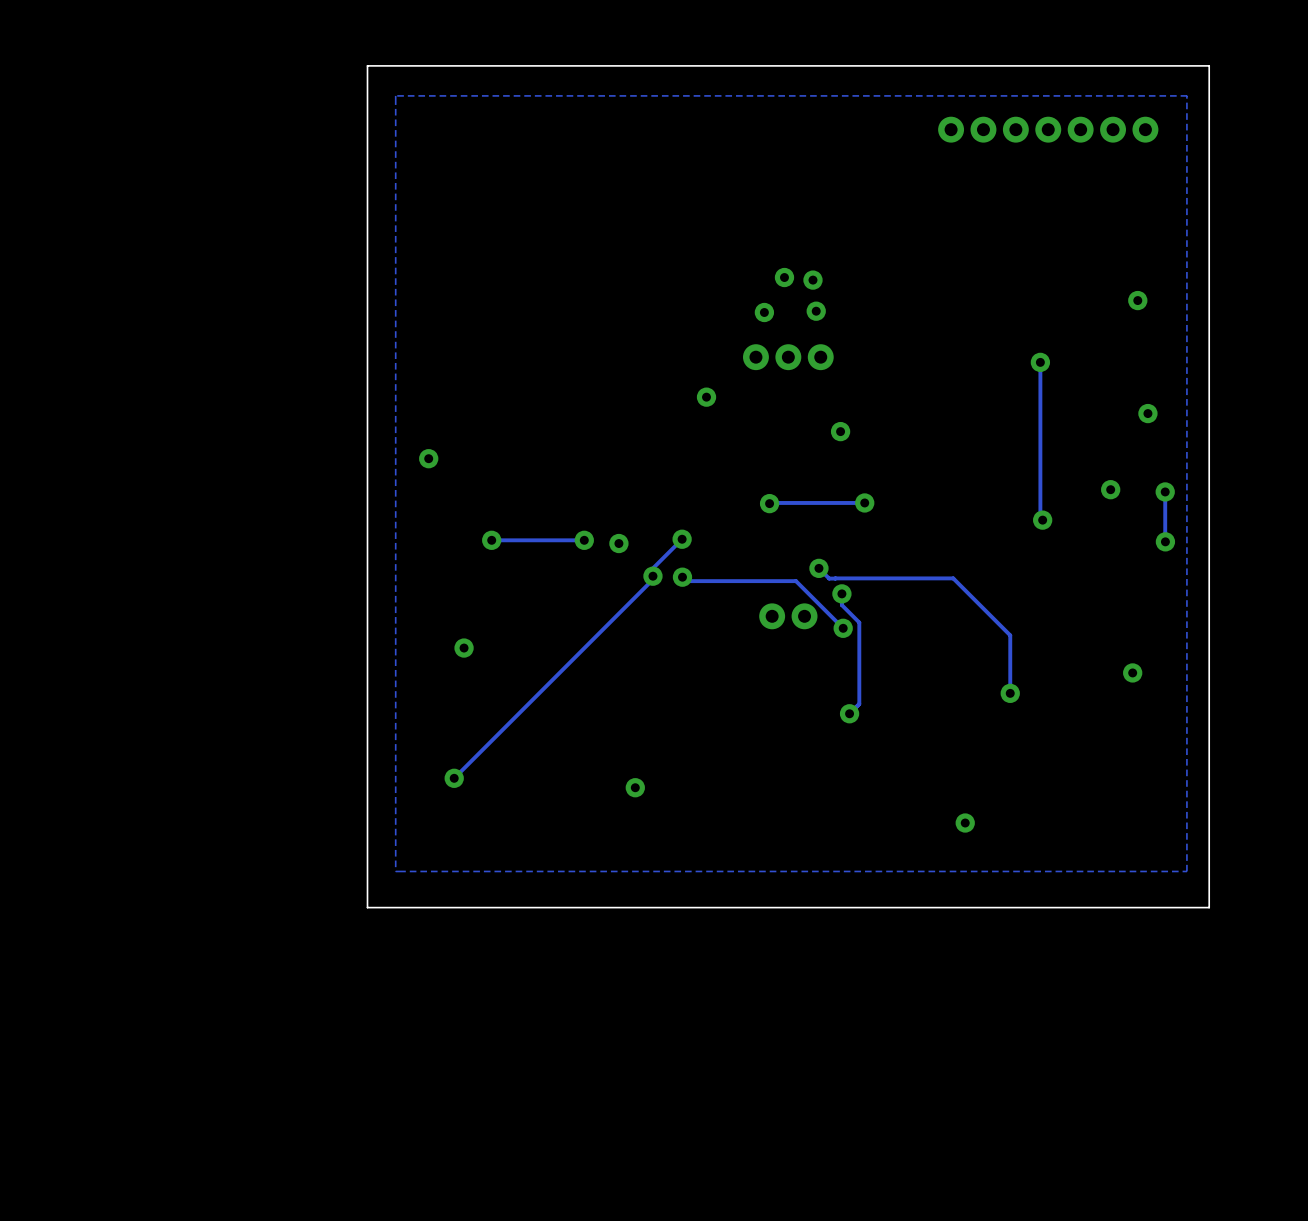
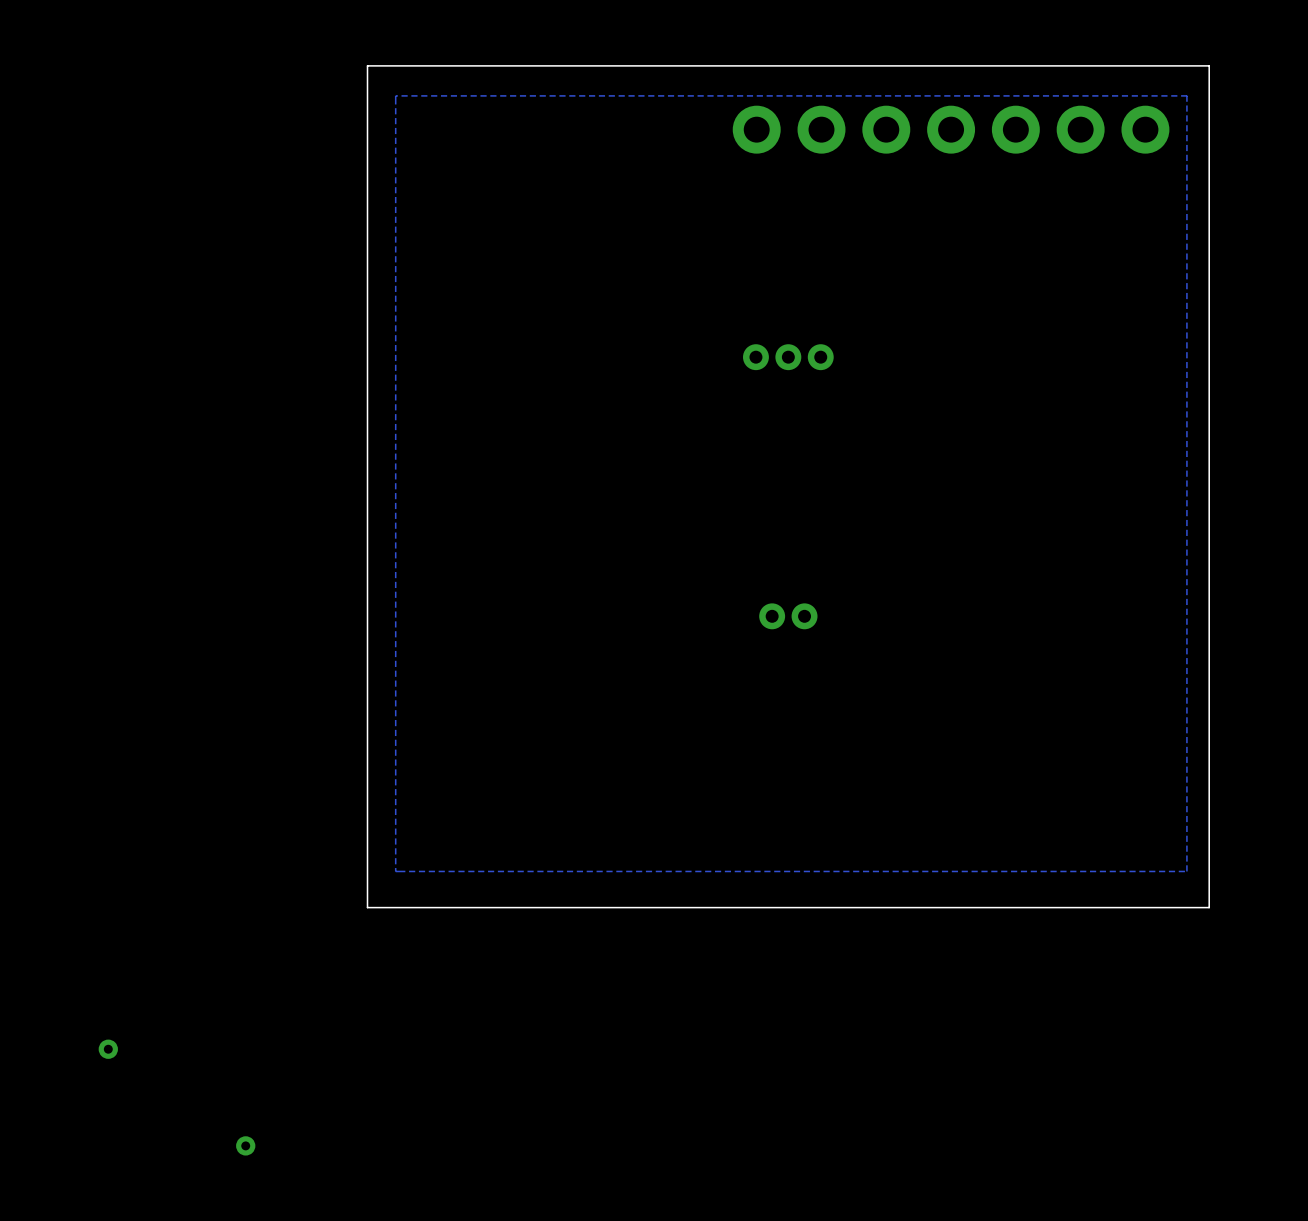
part: none -> (951, 129)
part: (1048, 129) -> none
via: (784, 277) -> none
via: (812, 280) -> none
via: (1137, 300) -> none
via: (816, 311) -> none
via: (764, 312) -> none
track: (1040, 362) (1040, 517) (1042, 519) -> none
via: (1040, 362) -> none
via: (706, 397) -> none
via: (1147, 413) -> none
via: (840, 431) -> none
via: (428, 458) -> none
via: (1110, 489) -> none
track: (1165, 491) (1165, 541) -> none
via: (1165, 491) -> none
track: (864, 502) (769, 503) -> none
via: (864, 502) -> none
via: (769, 503) -> none
via: (1042, 520) -> none
track: (682, 539) (652, 569) (652, 580) (454, 778) -> none
via: (682, 539) -> none
via: (491, 540) -> none
track: (584, 540) (491, 540) -> none
via: (584, 540) -> none
via: (1165, 541) -> none
via: (618, 543) -> none
track: (818, 568) (829, 578) (835, 578) -> none
via: (818, 568) -> none
via: (652, 576) -> none
track: (682, 577) (682, 581) (796, 581) (843, 628) -> none
via: (682, 577) -> none
track: (835, 578) (953, 578) (1010, 635) (1010, 693) -> none
track: (841, 593) (841, 605) (859, 622) (859, 704) (849, 713) -> none
via: (841, 593) -> none
via: (843, 628) -> none
via: (464, 648) -> none
via: (1132, 672) -> none
via: (1010, 693) -> none
via: (849, 713) -> none
via: (454, 778) -> none
via: (635, 787) -> none
via: (965, 823) -> none
via: none -> (108, 1049)
via: none -> (245, 1145)

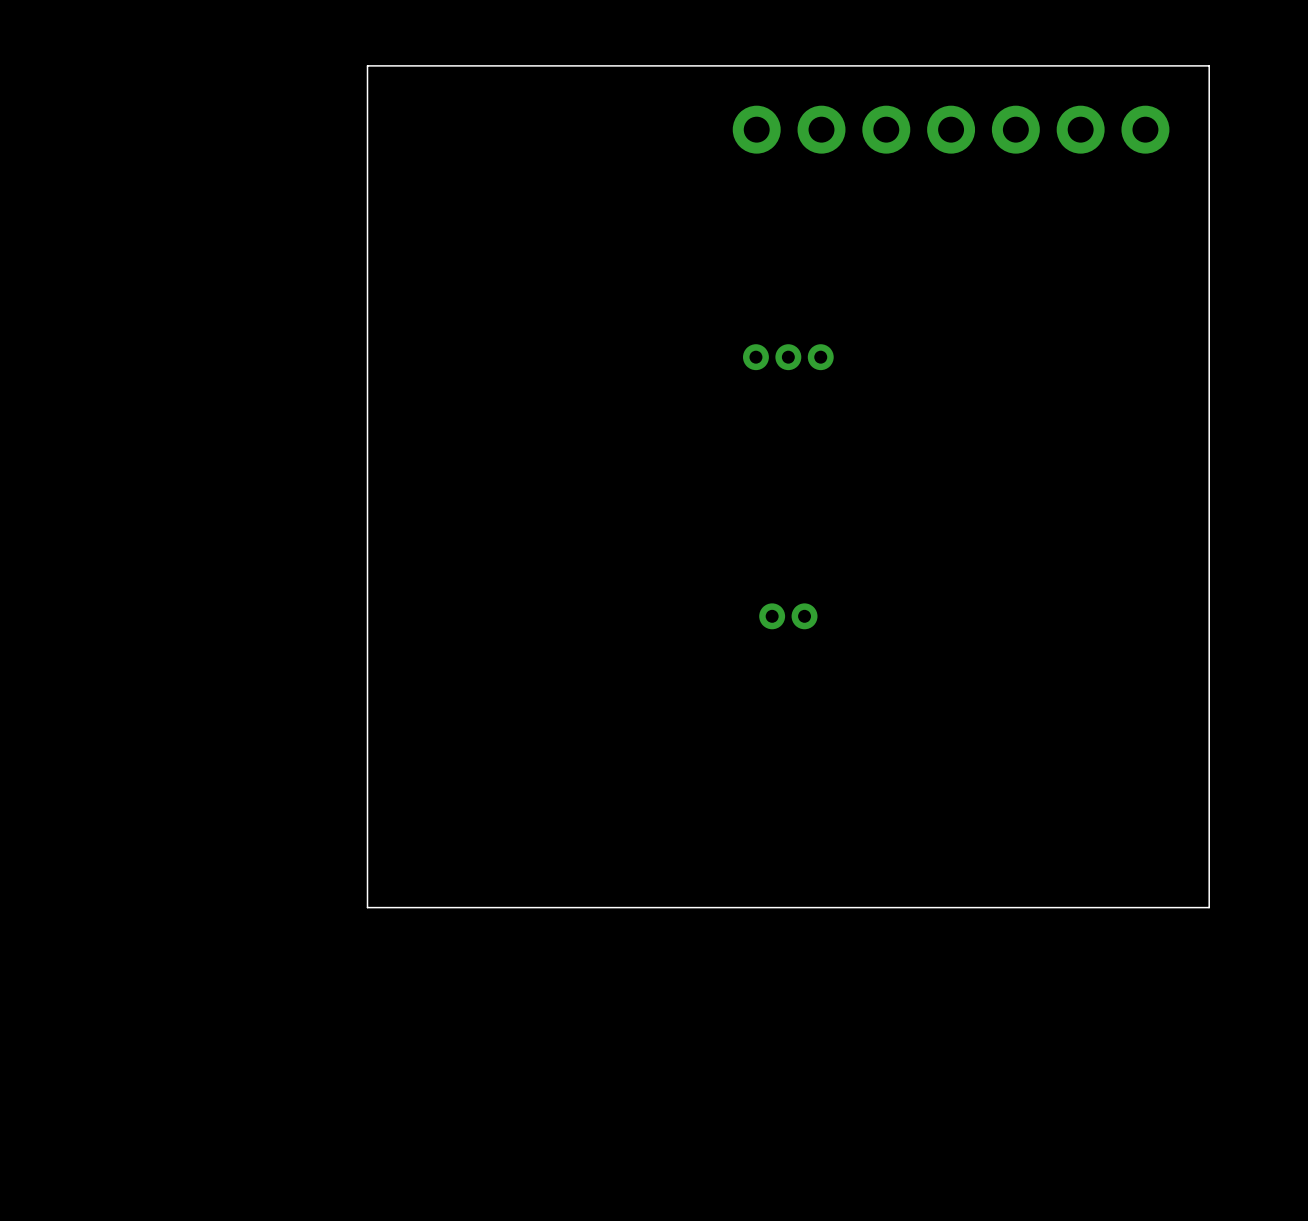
zone outline: (1186, 96) (1186, 871) (395, 871) (395, 95) (1186, 96) -> none
via: (108, 1049) -> none
via: (245, 1145) -> none

